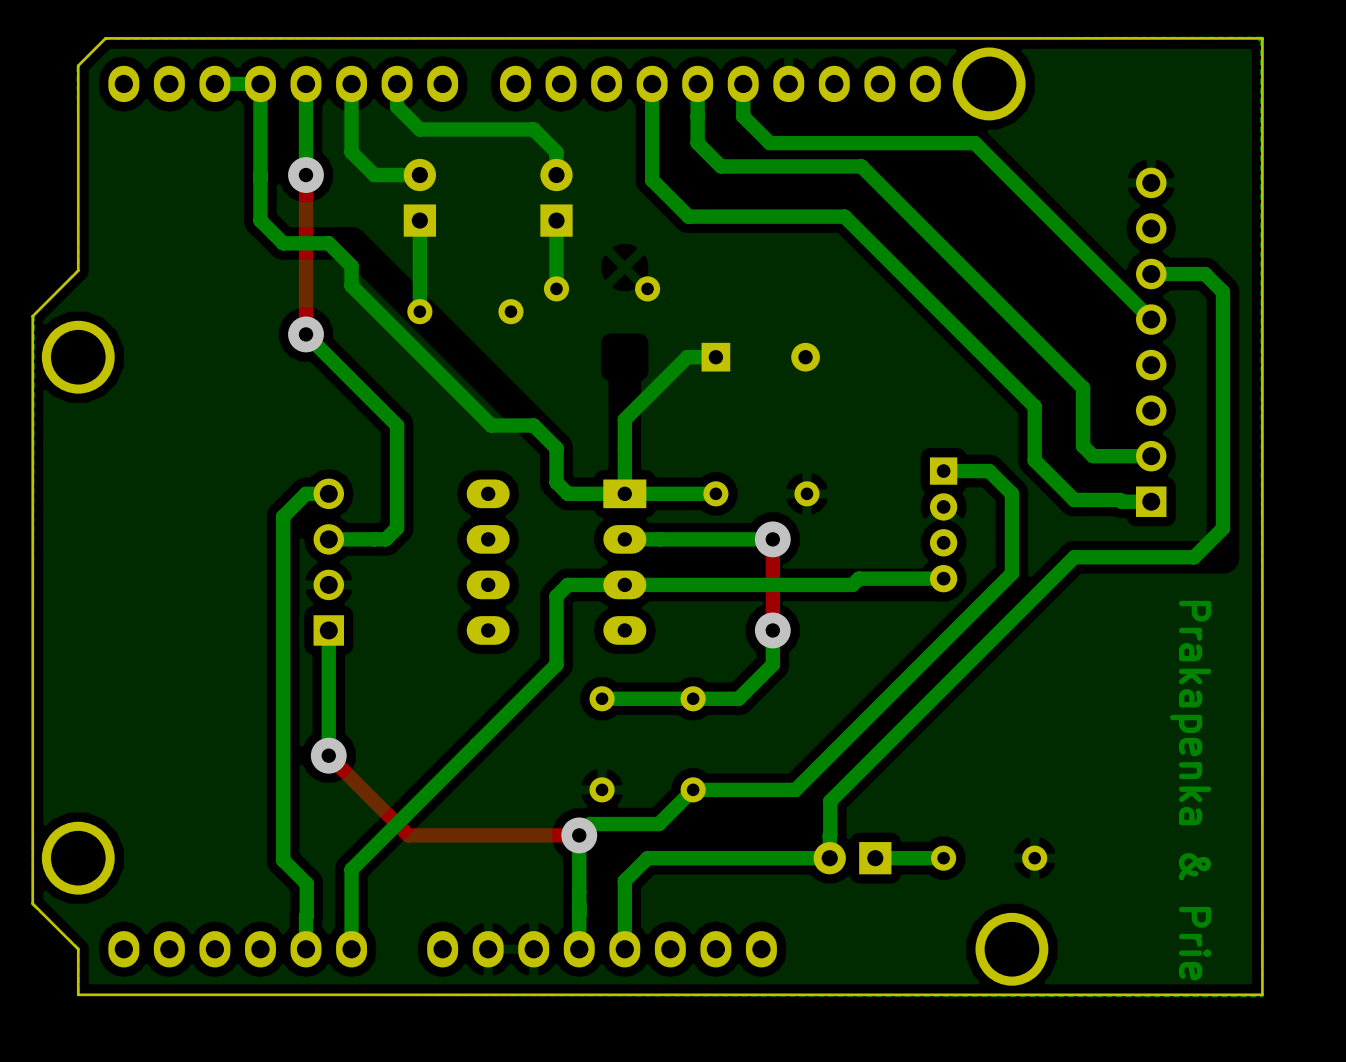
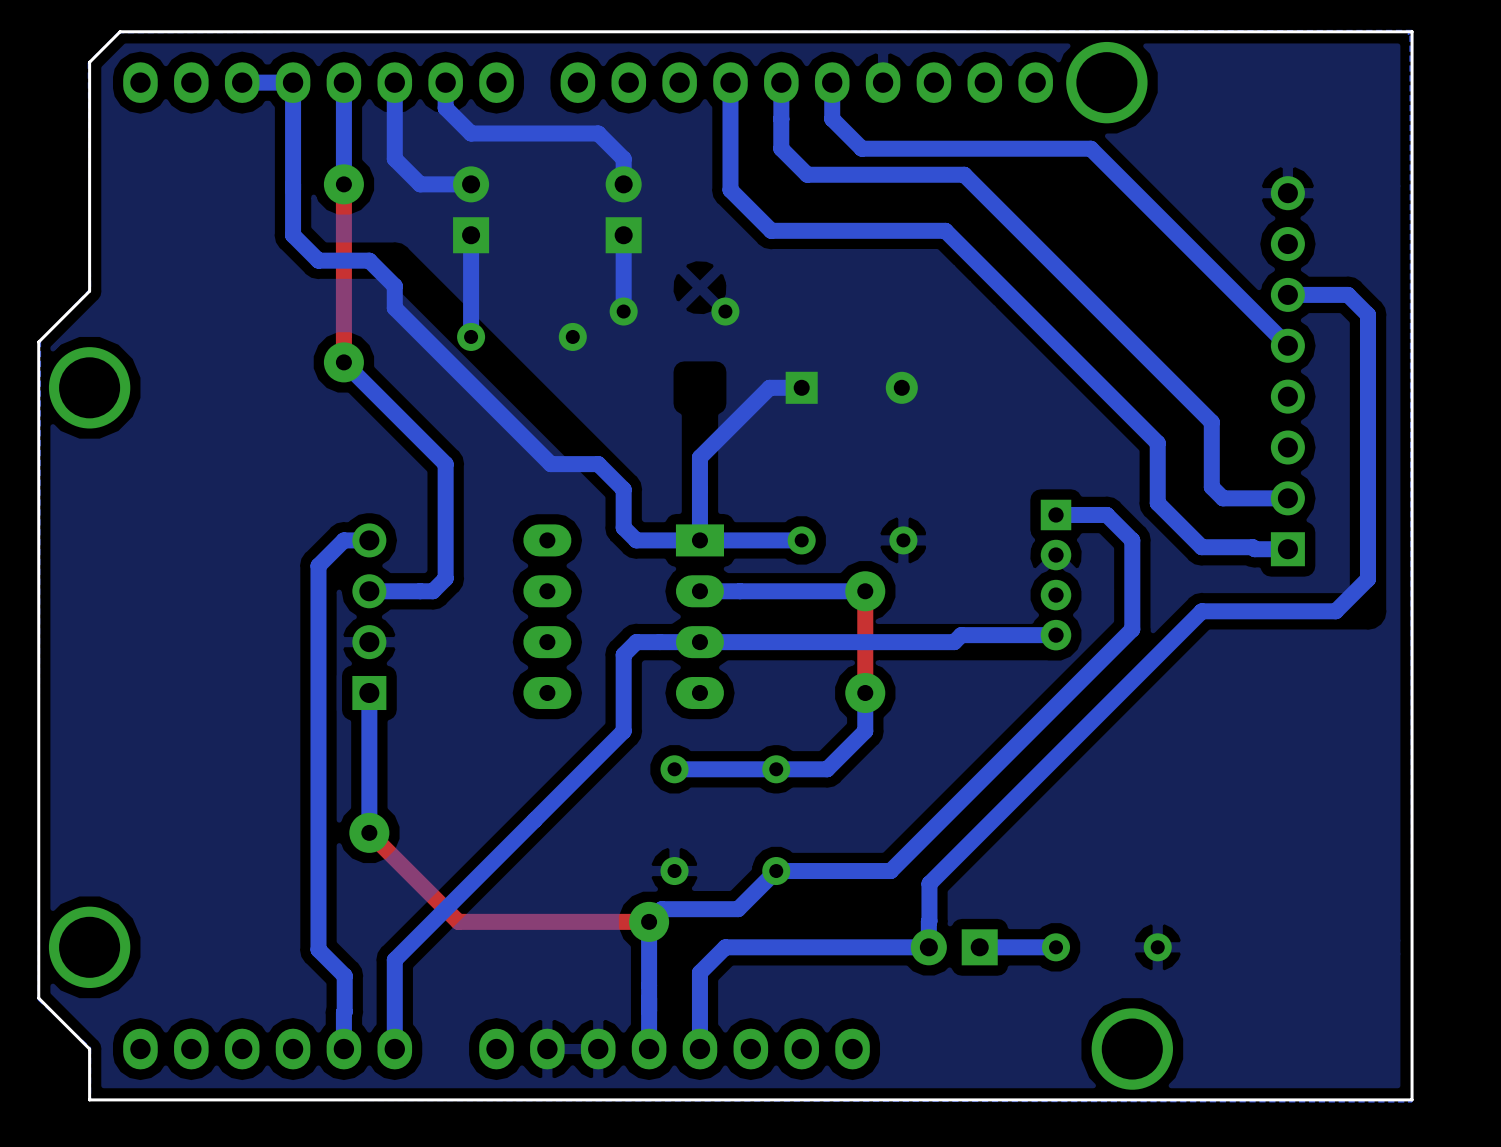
text: Prakapenka & Prie (1190, 790) -> none

